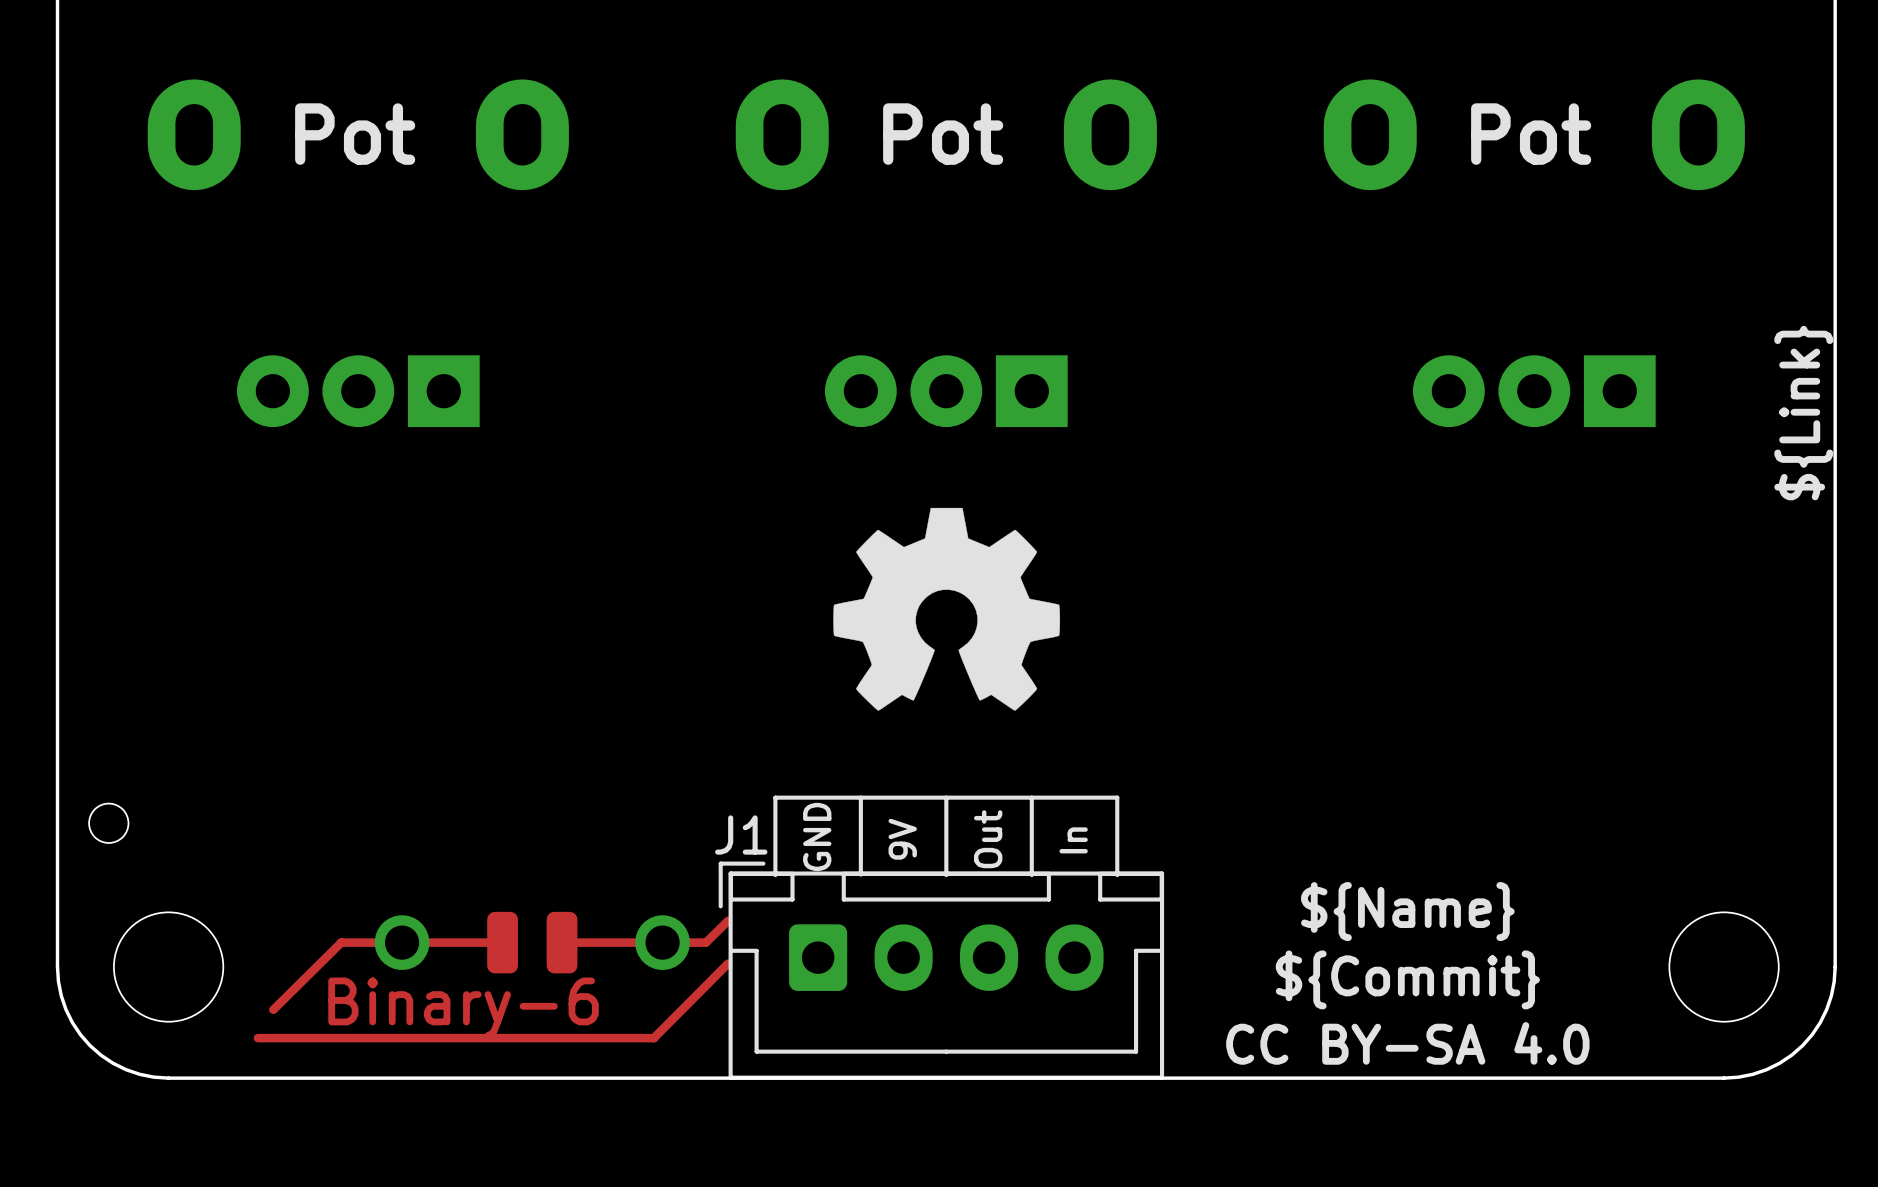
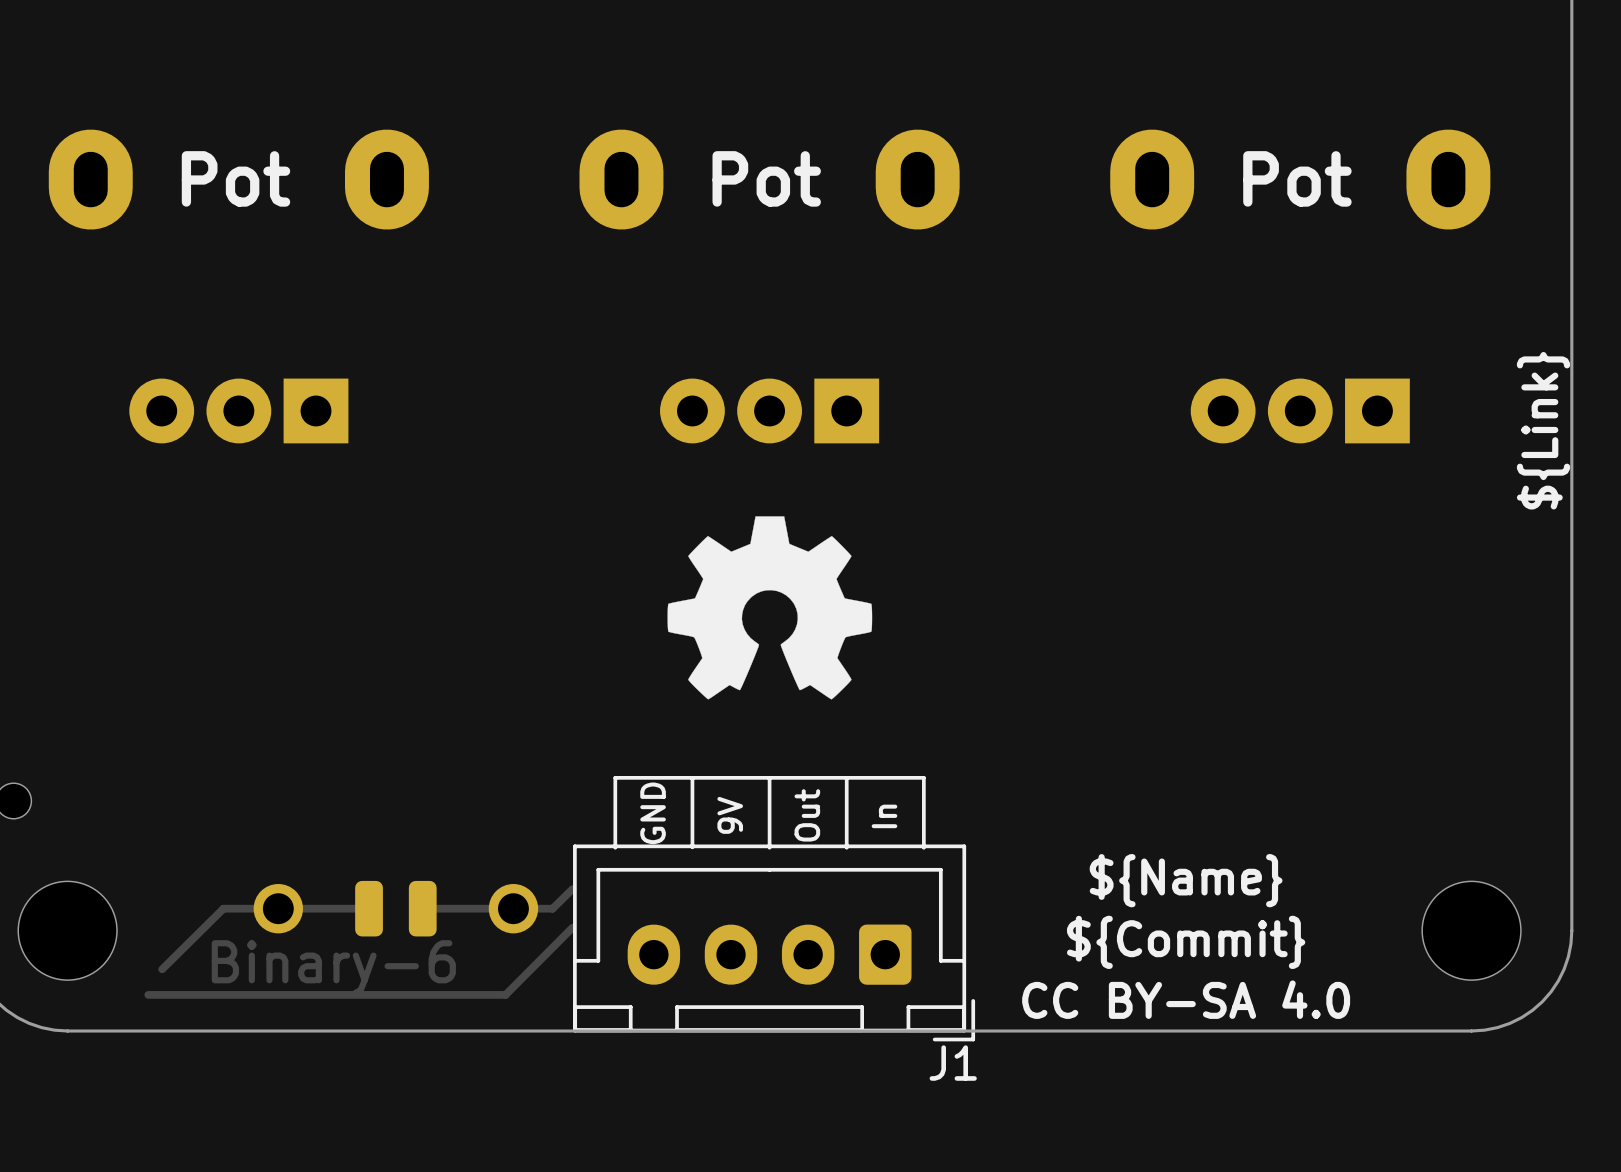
J1 rotation: 0° (941, 970) -> 180° (774, 942)

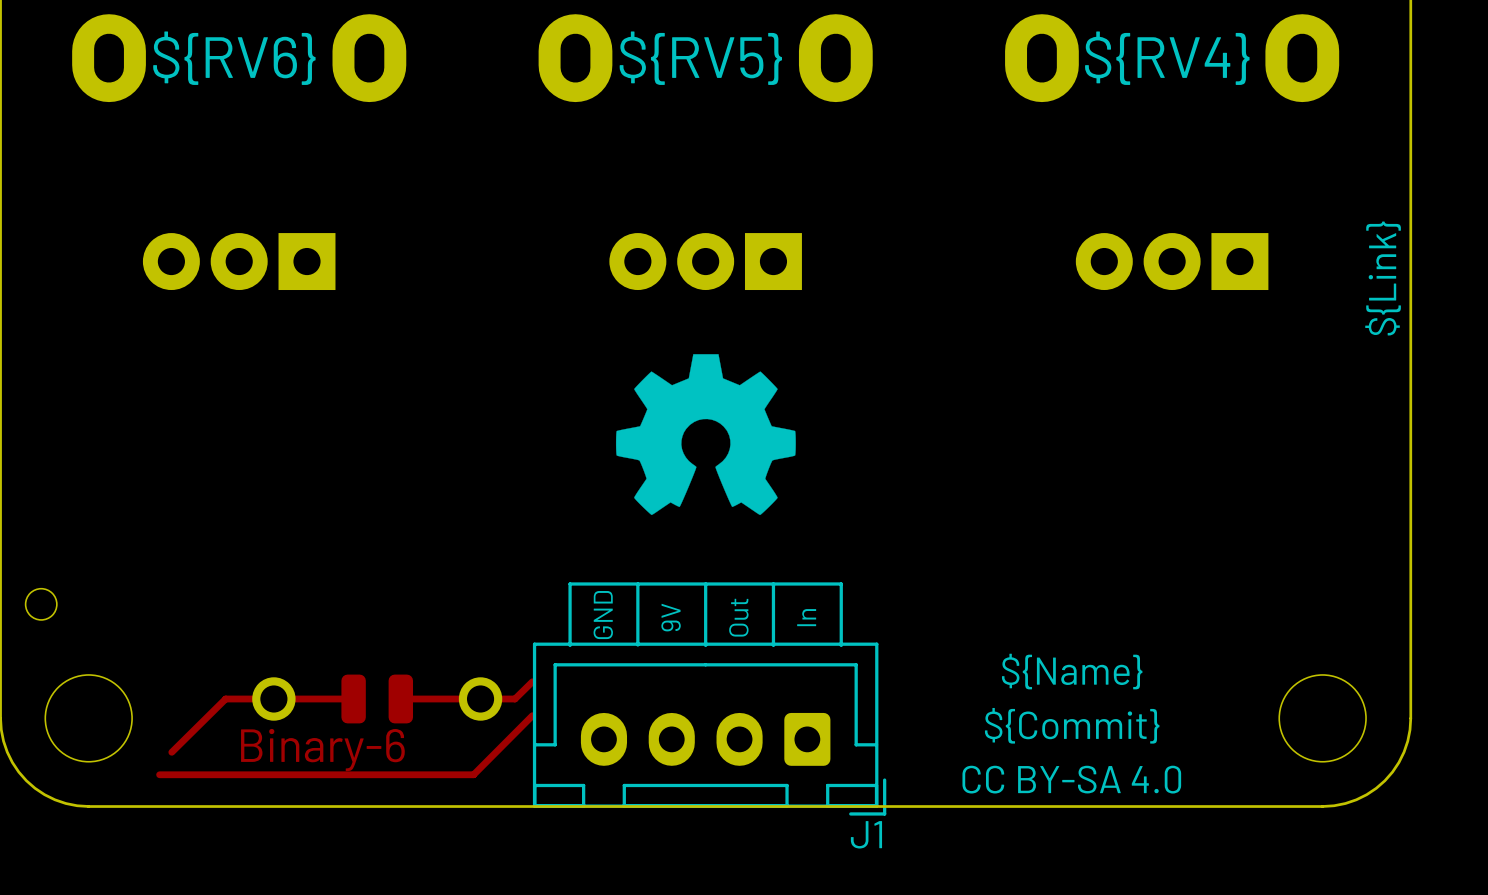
text: Pot (236, 178) -> ${RV6} (234, 58)
text: Pot (766, 178) -> ${RV5} (700, 58)
text: Pot (1297, 178) -> ${RV4} (1167, 58)

